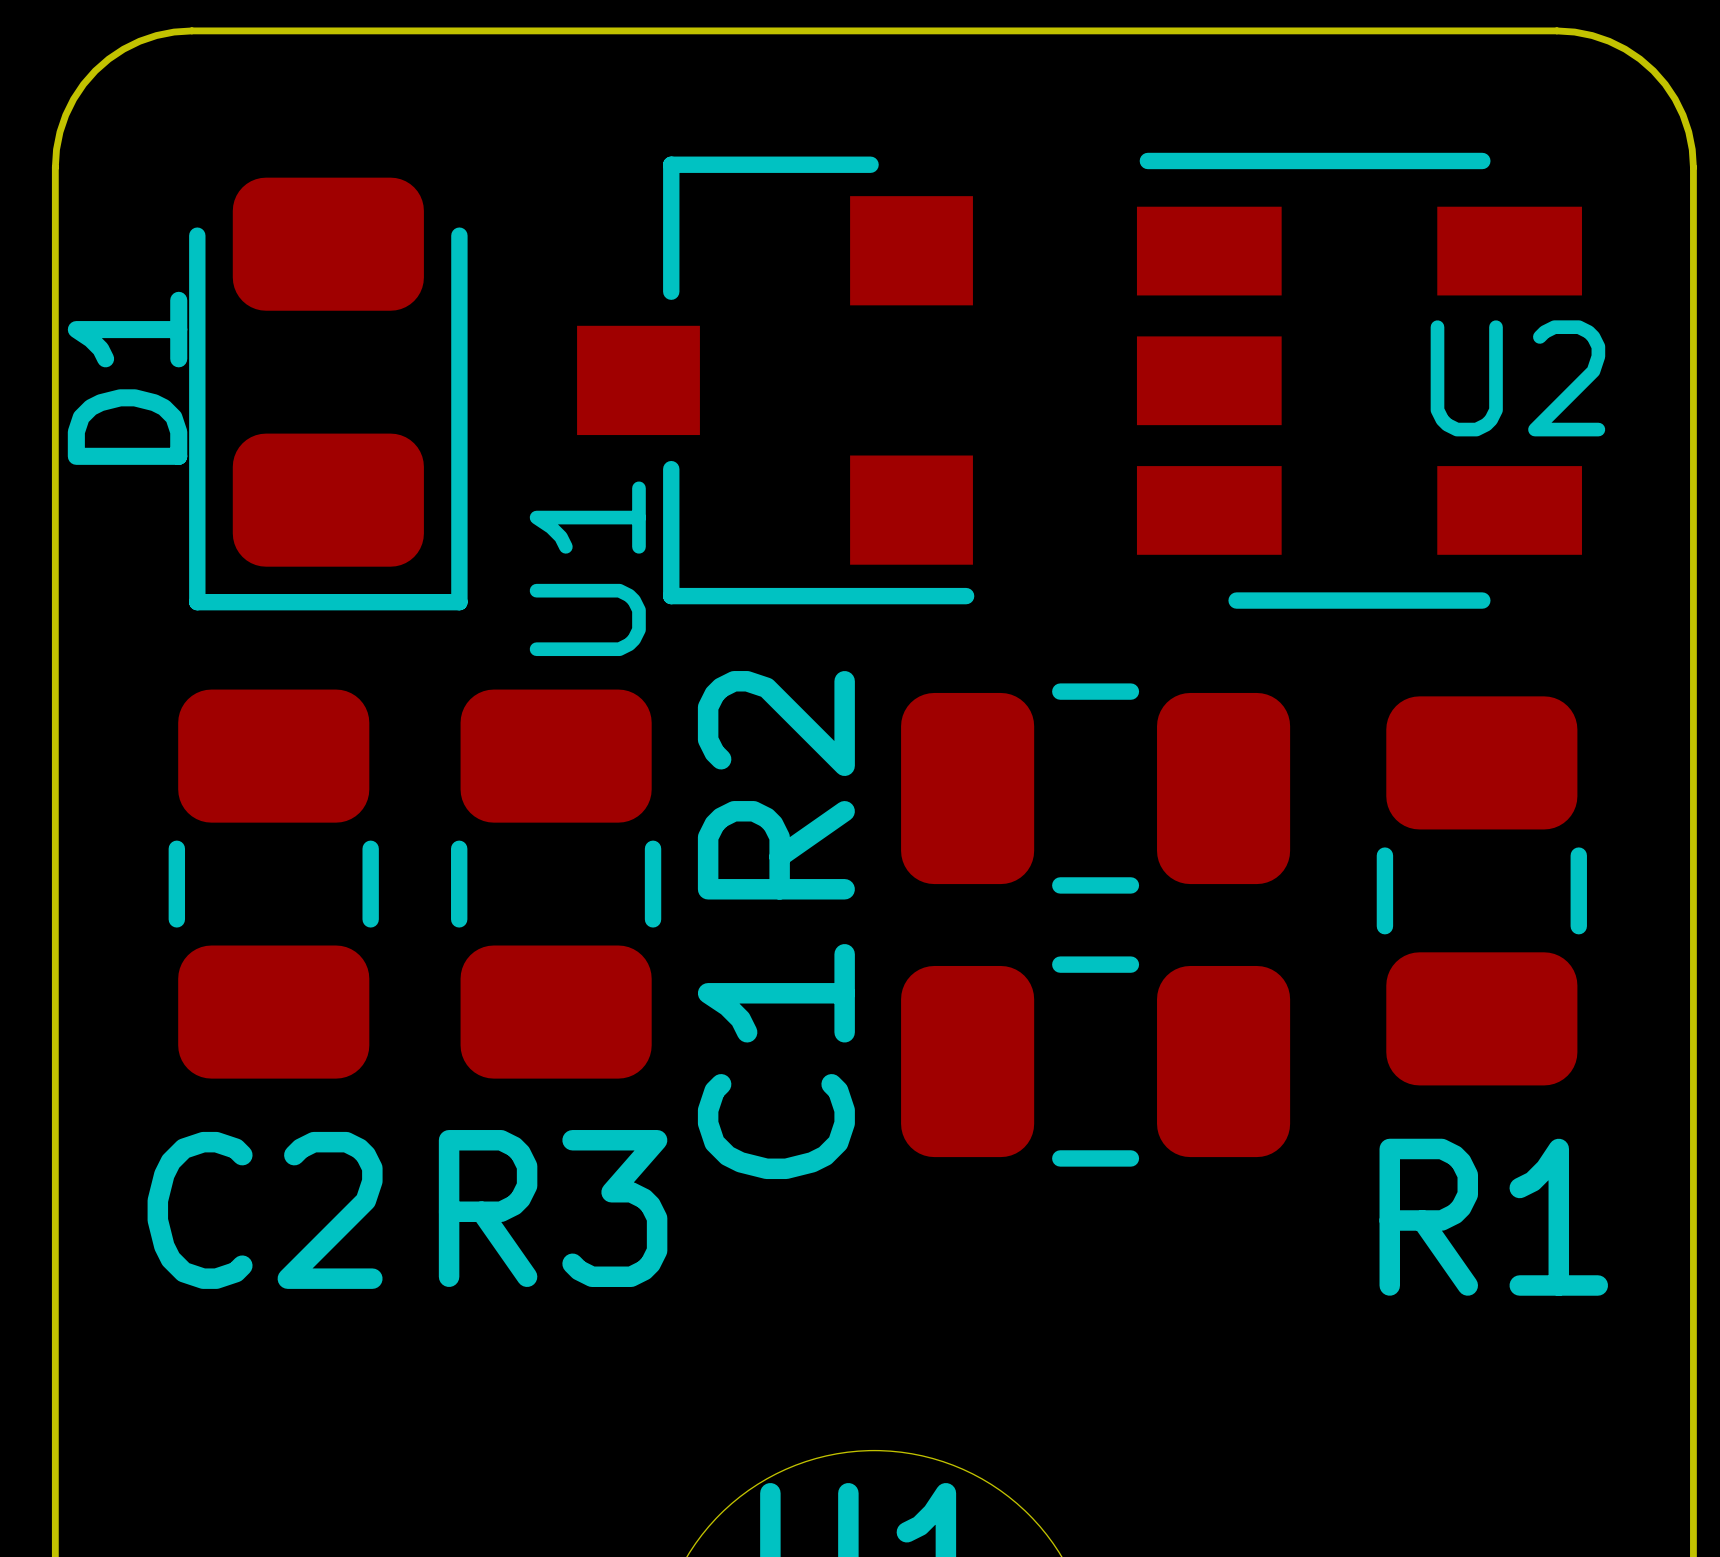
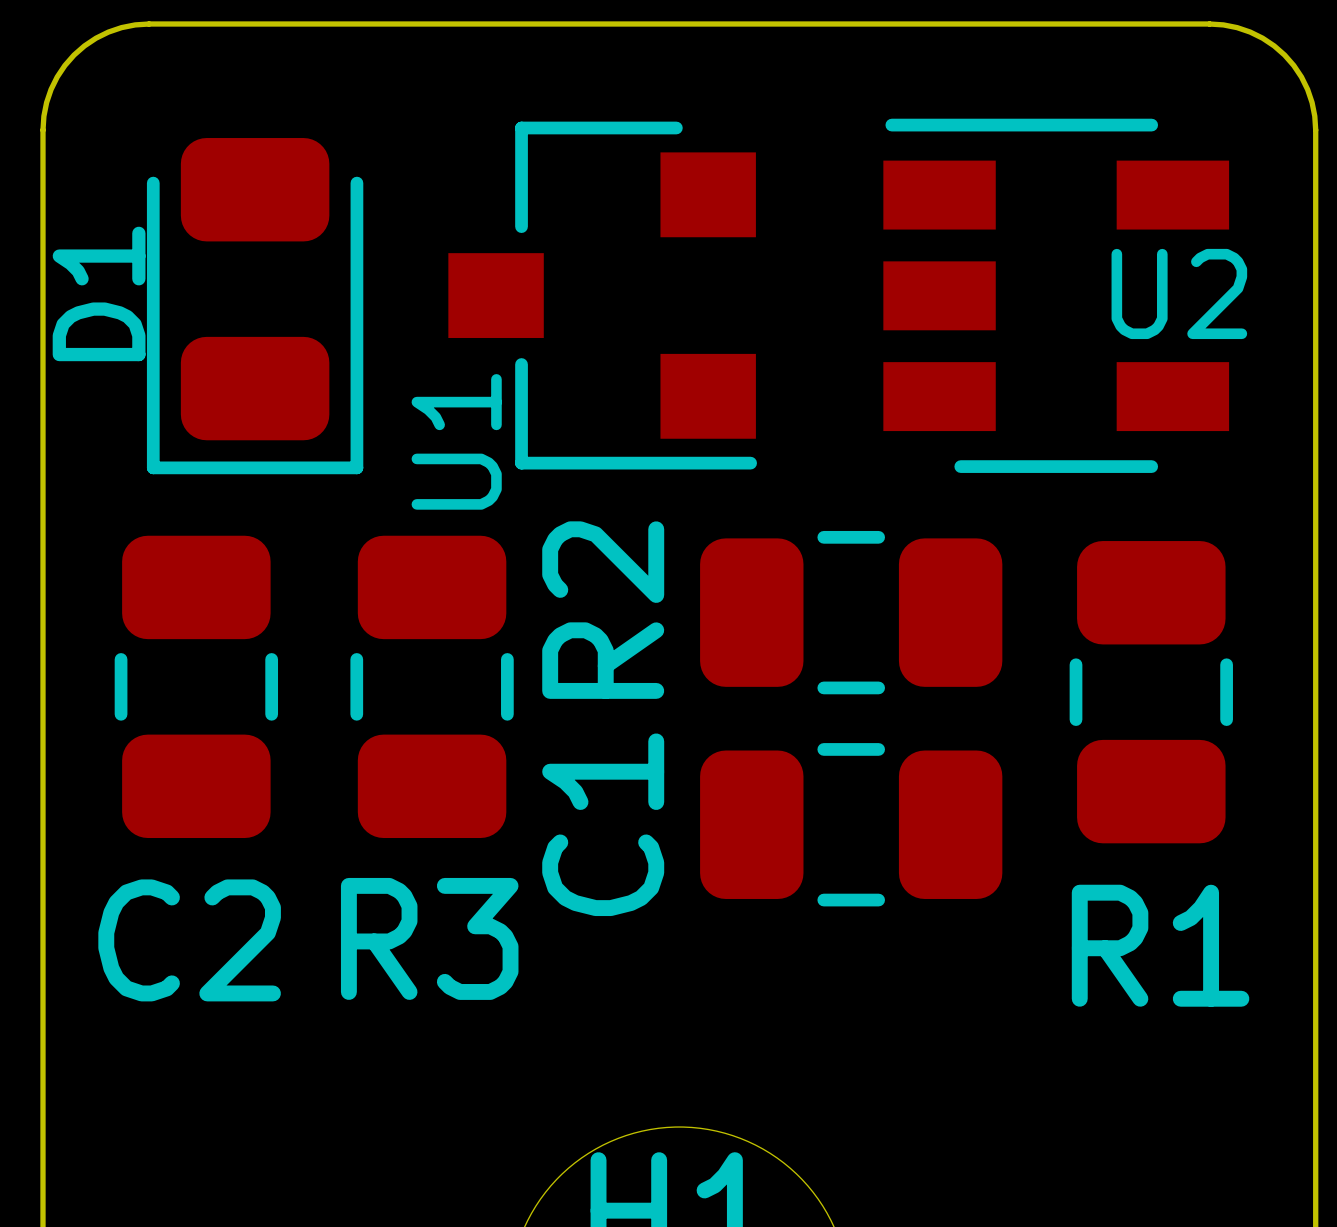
C2 position: (273, 884) -> (196, 686)

